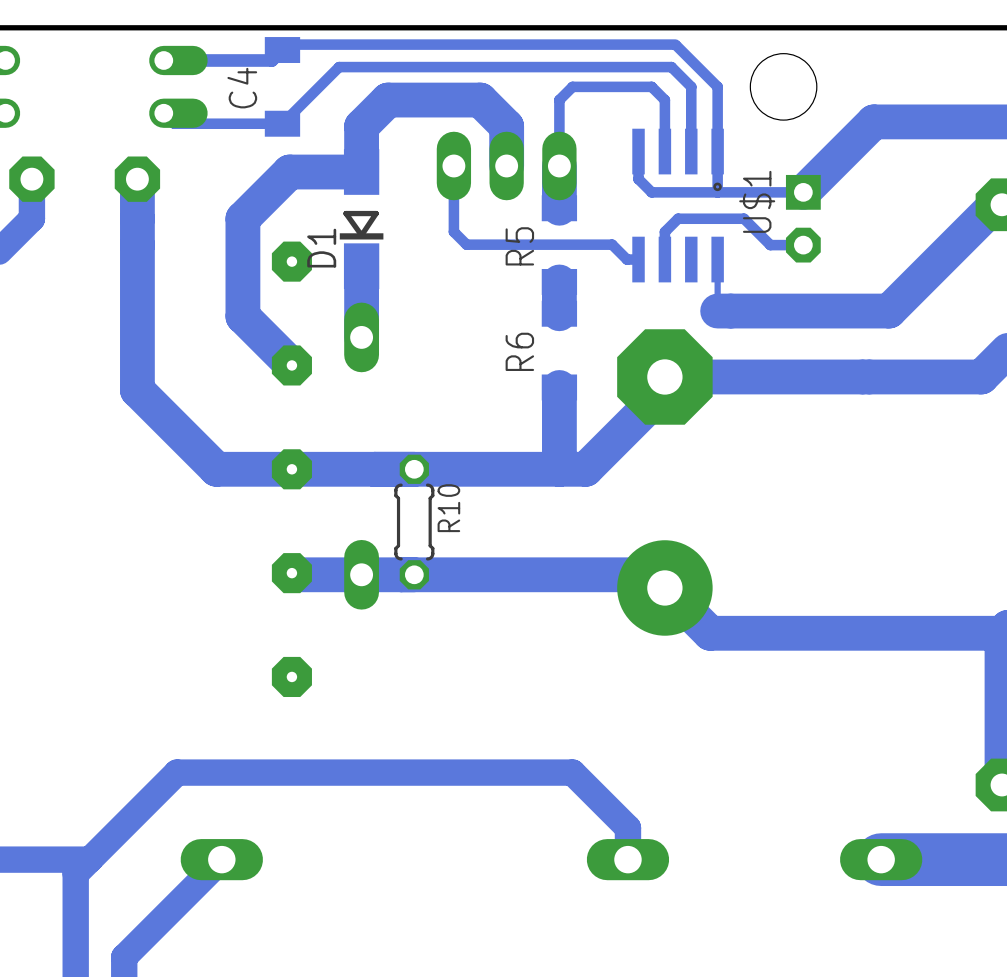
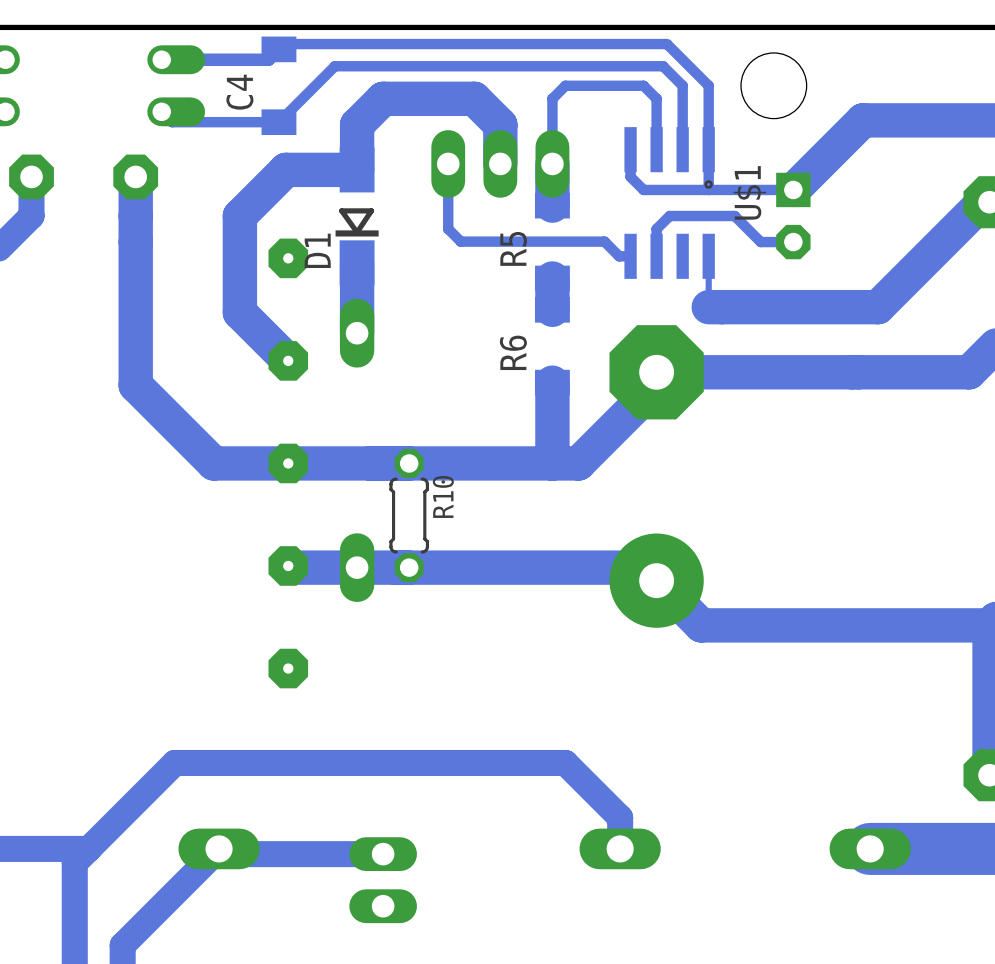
bottom track: none -> (383, 854) (224, 854)
part: none -> (383, 880)

